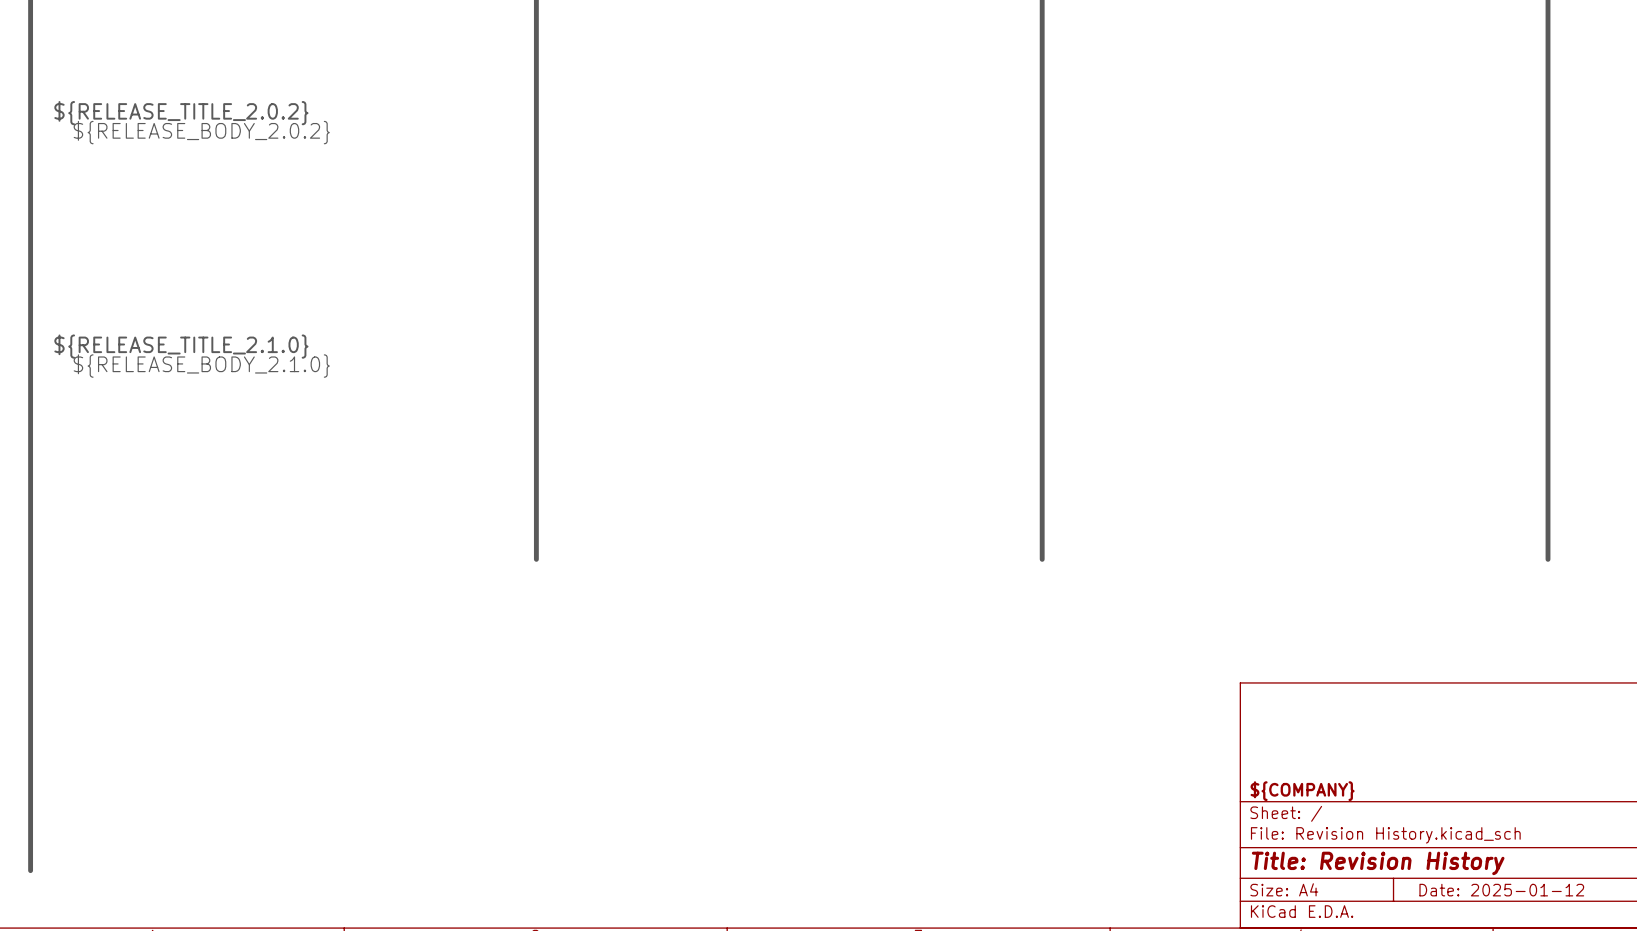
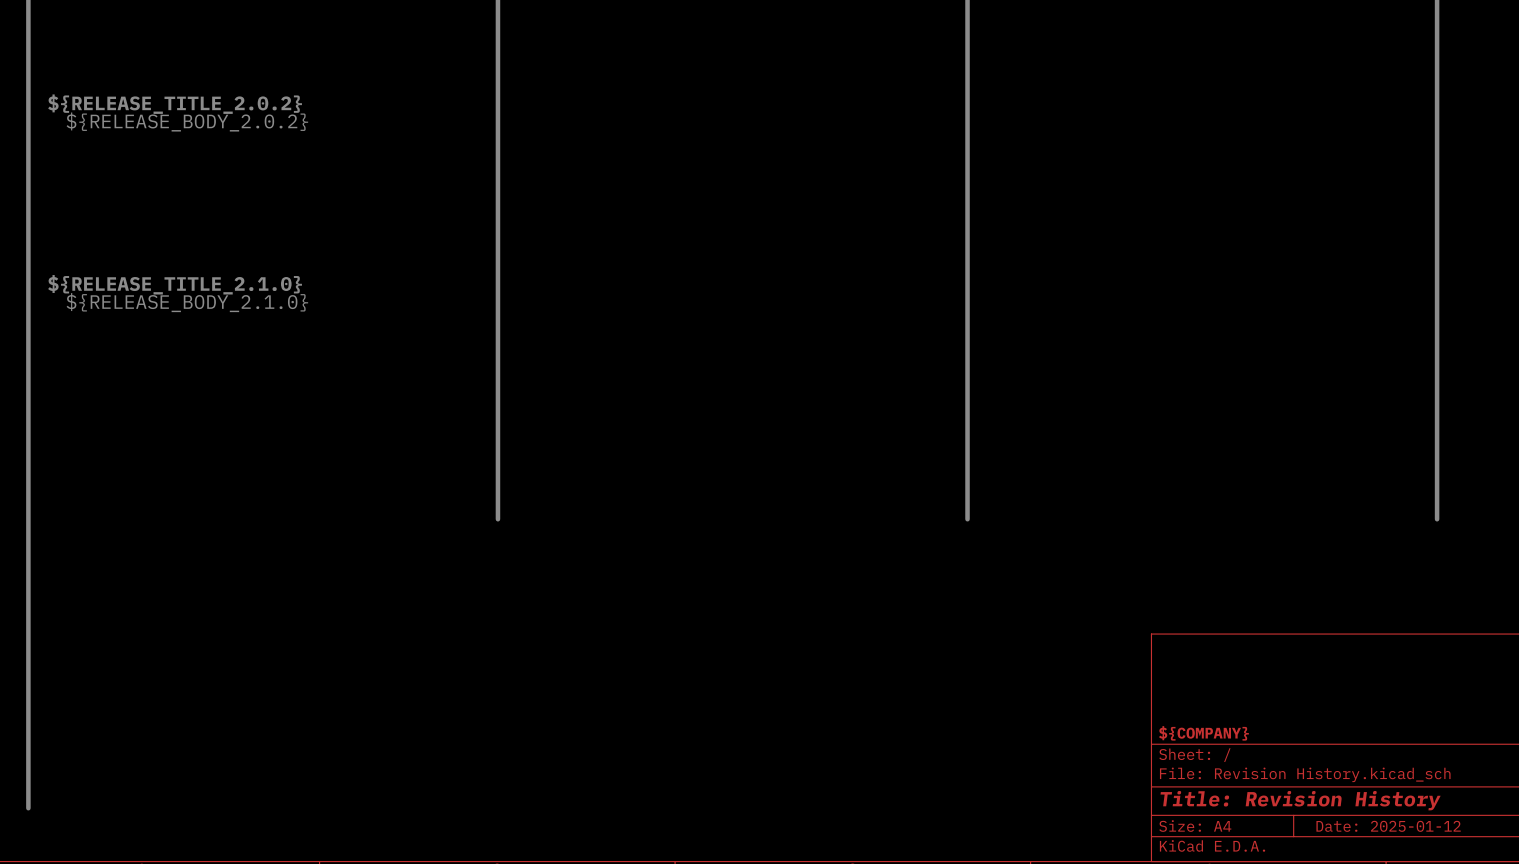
text position: ${RELEASE_TITLE_2.1.0} (181, 346) -> ${RELEASE_TITLE_2.1.0} (175, 284)
text position: ${RELEASE_BODY_2.1.0} (201, 366) -> ${RELEASE_BODY_2.1.0} (187, 302)

